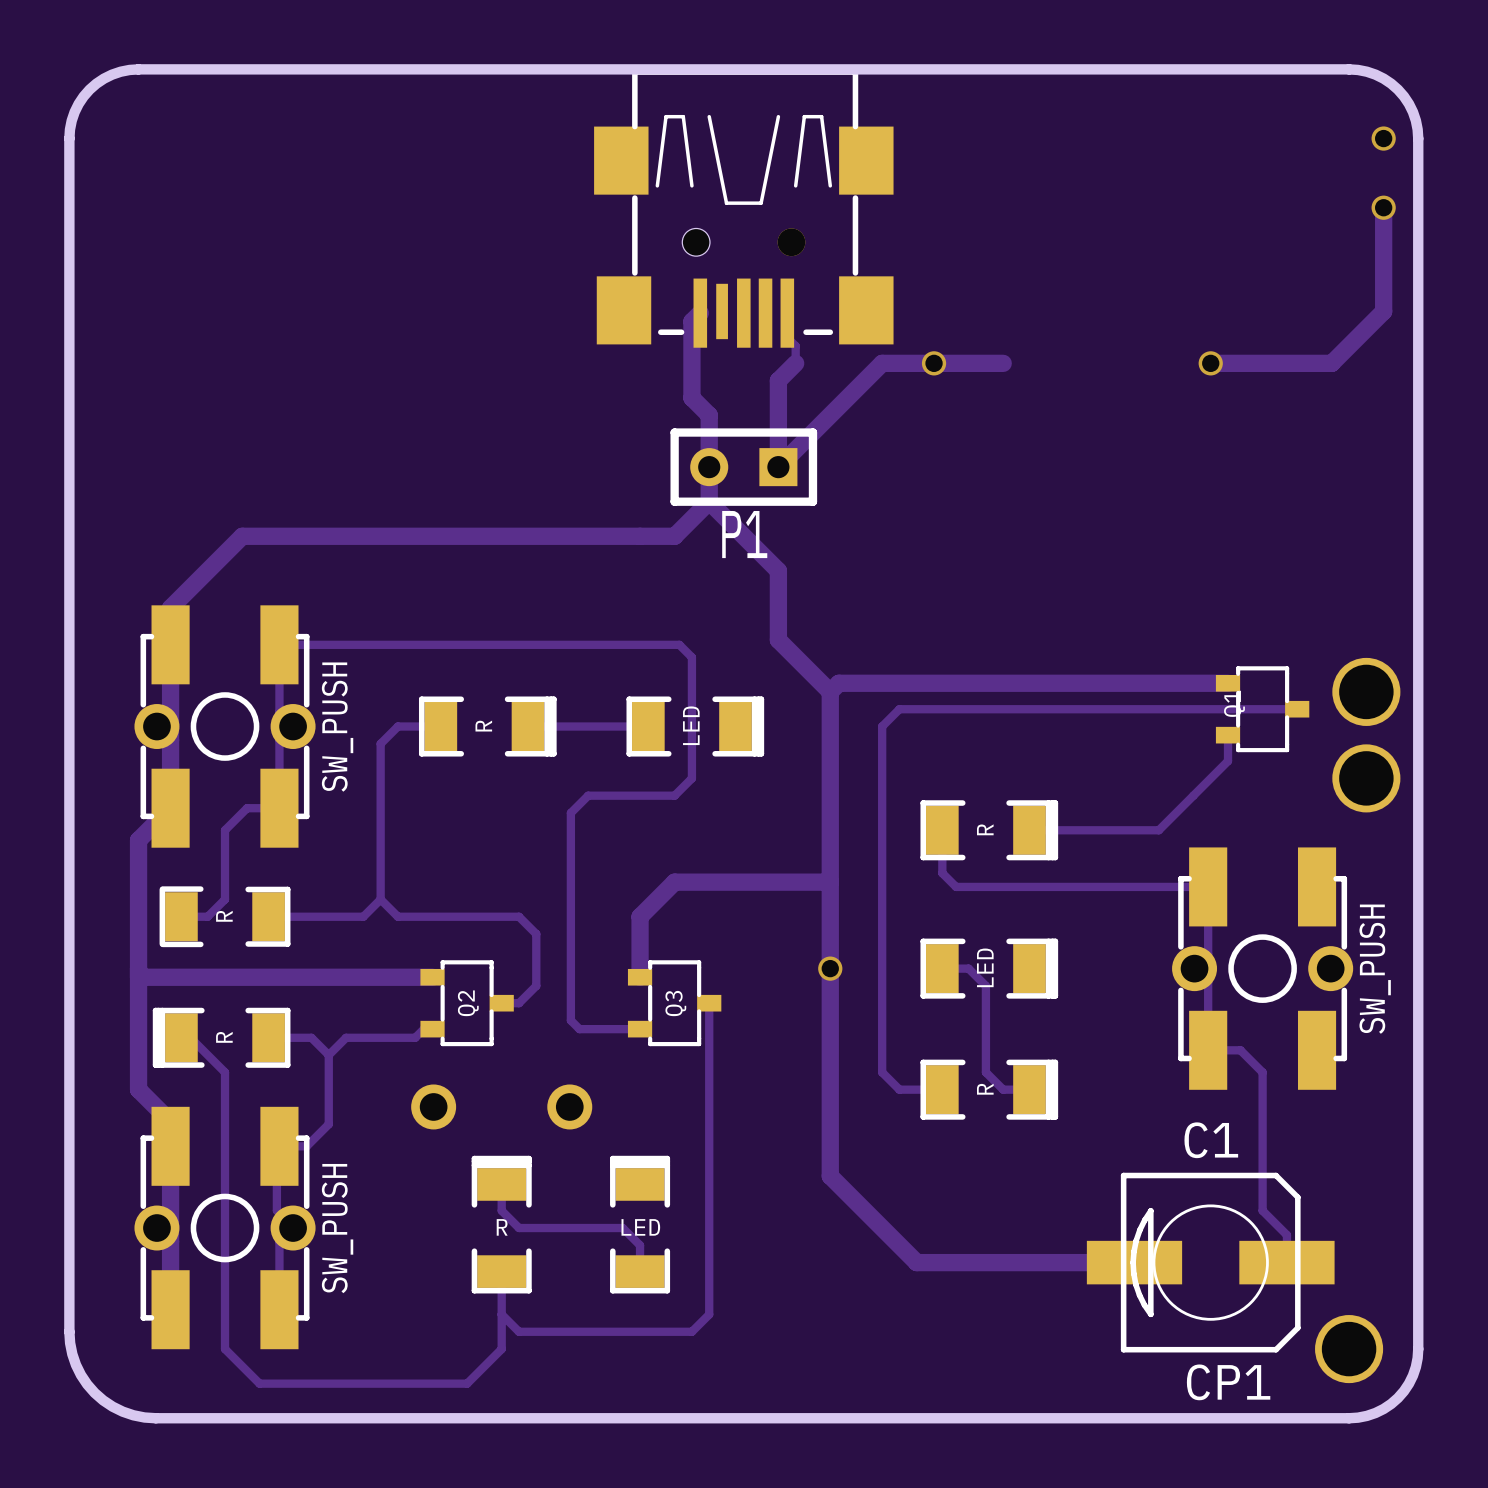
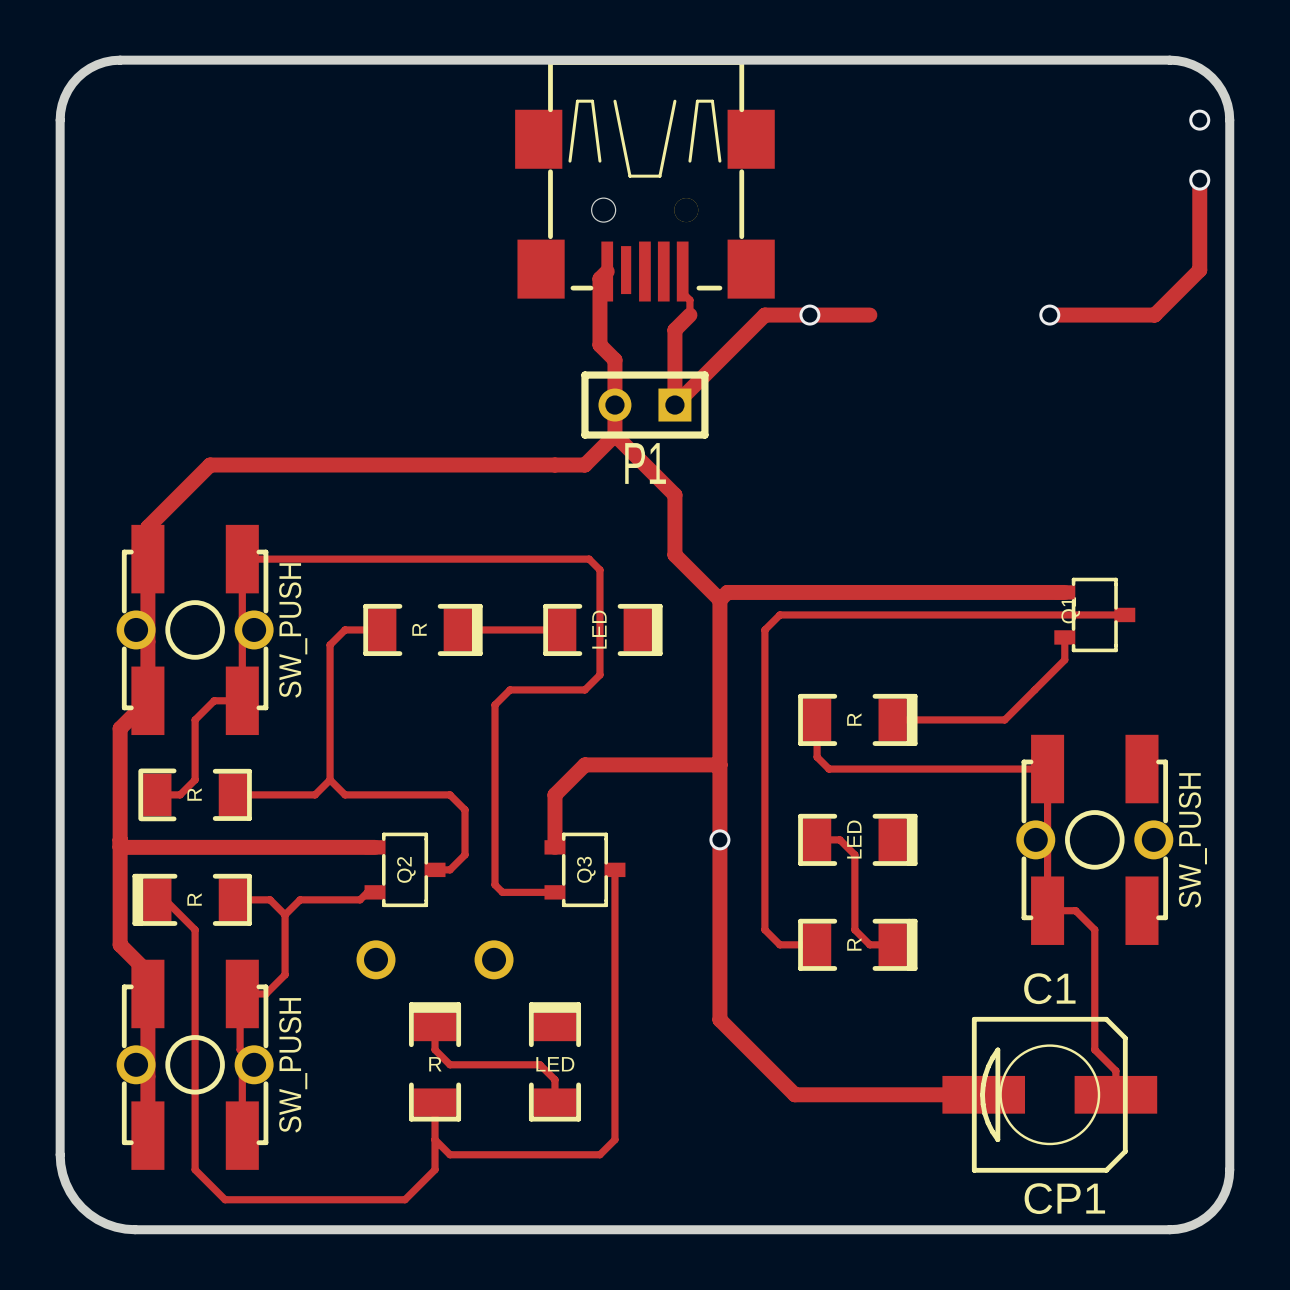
part: (1366, 691) -> none
part: (1366, 778) -> none
part: (1349, 1349) -> none

